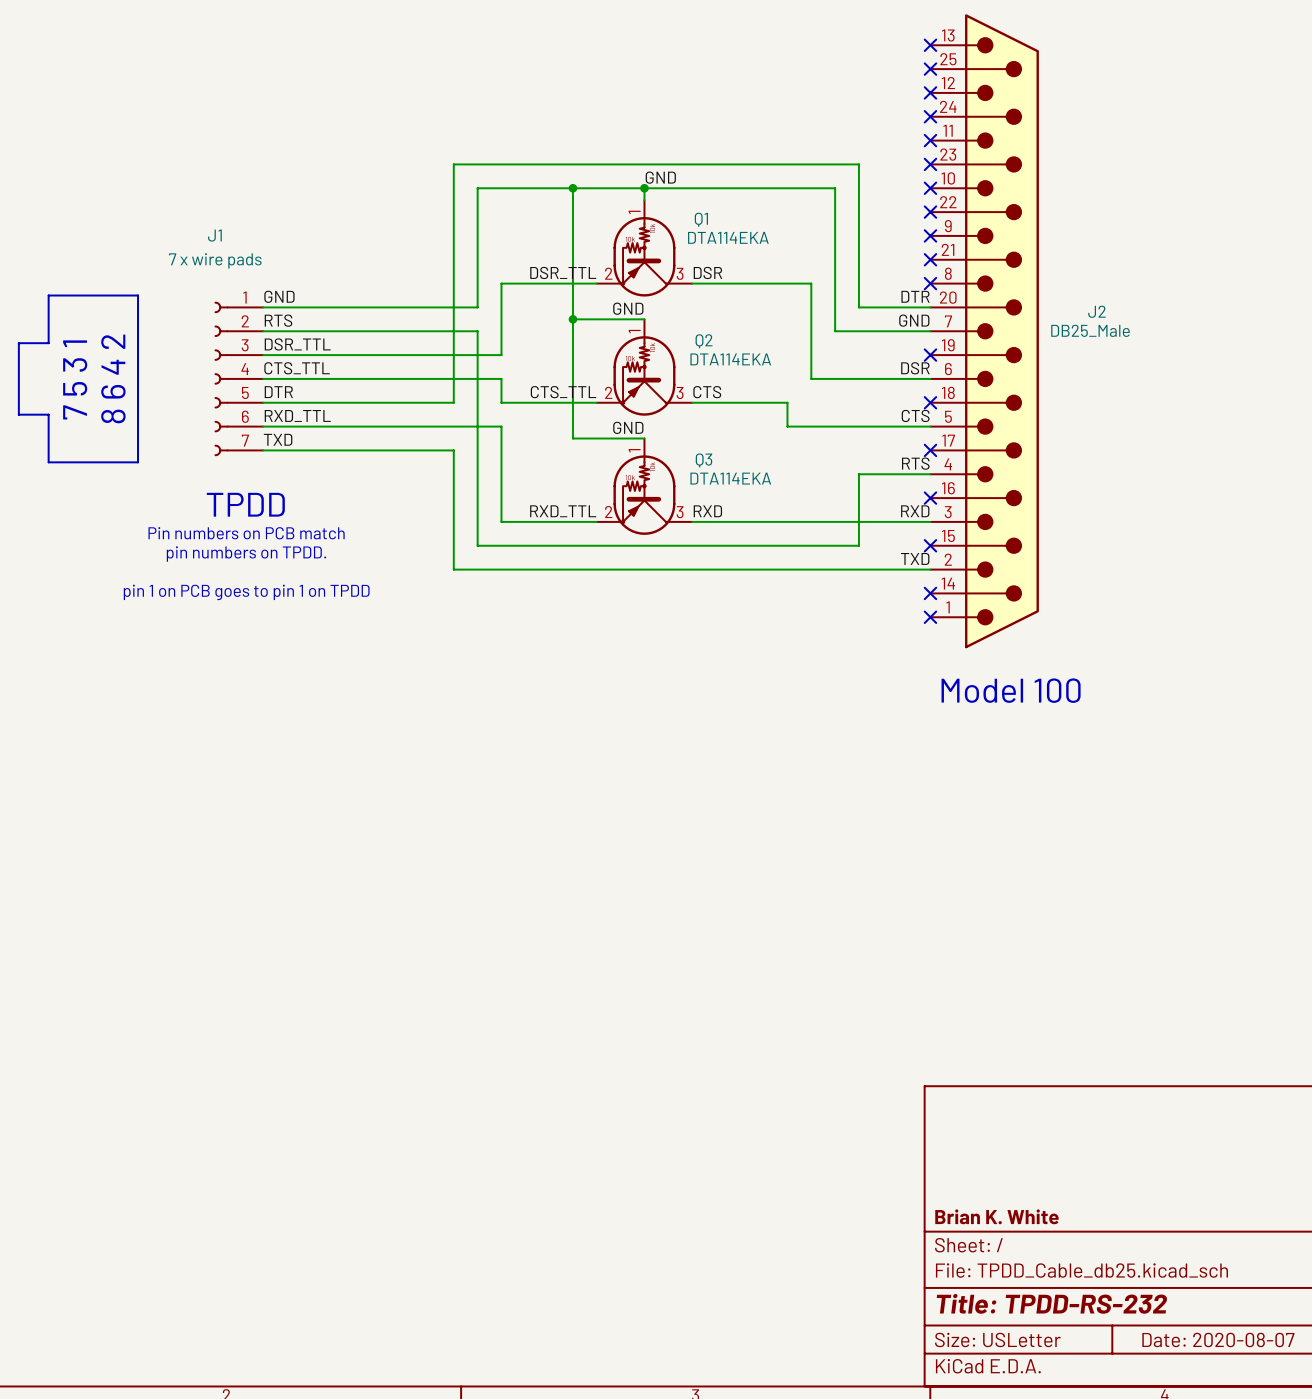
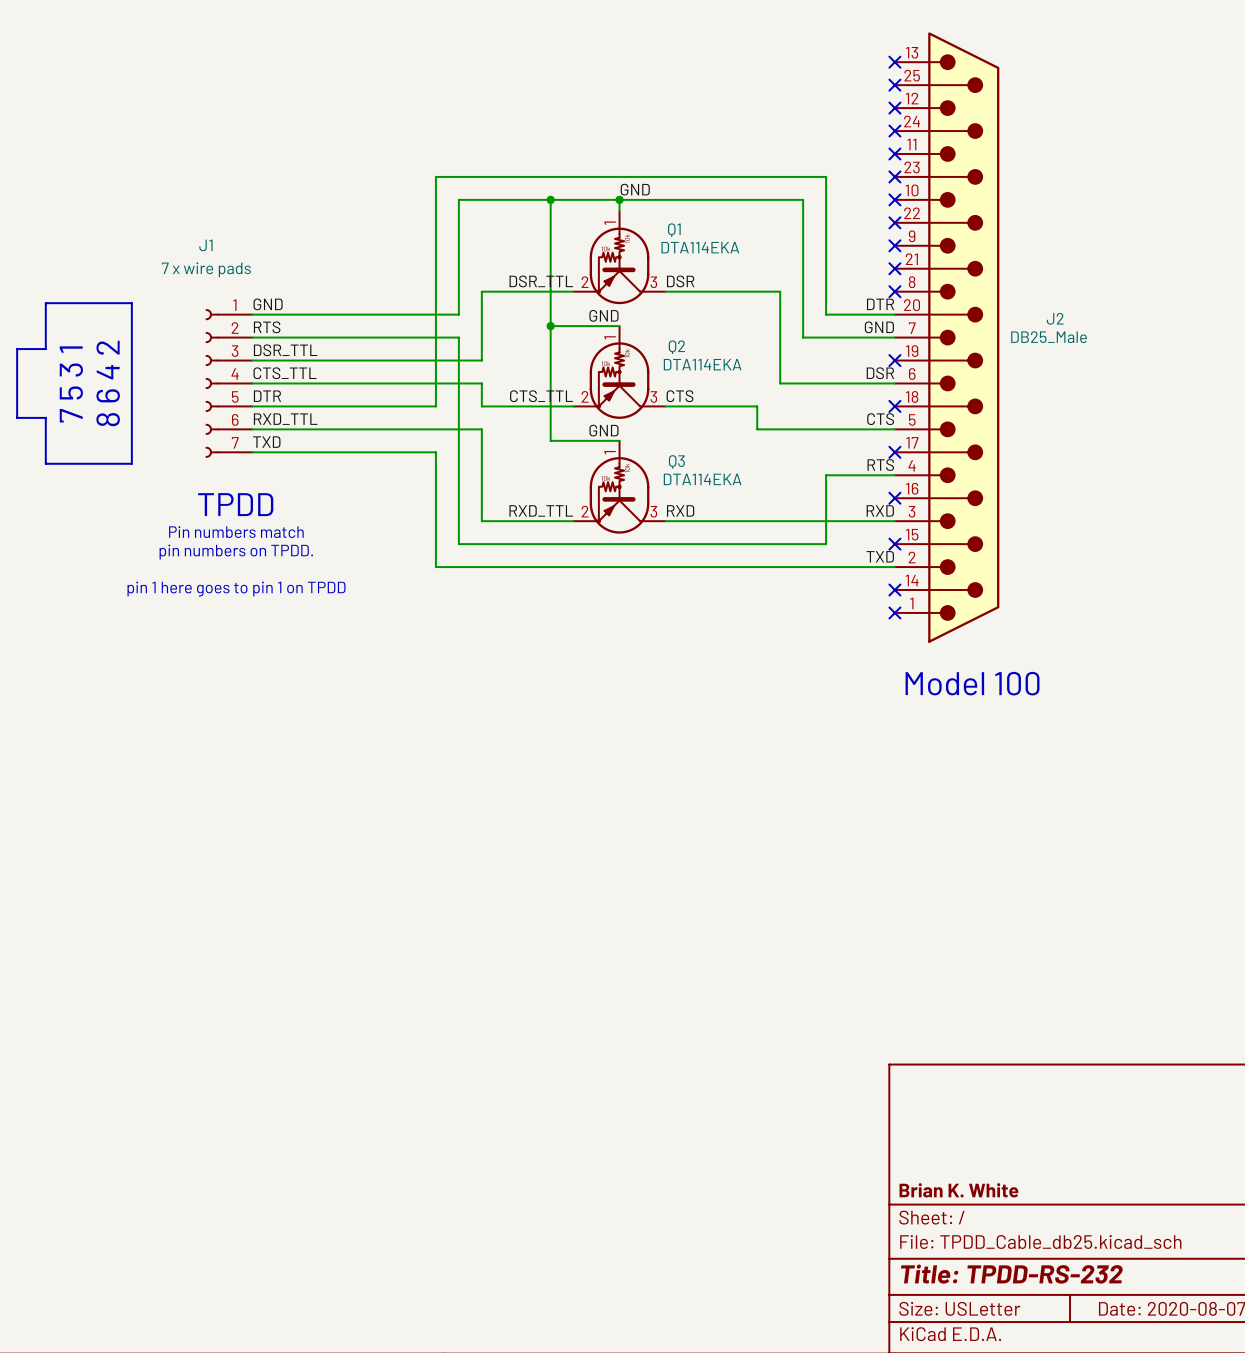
text: Pin numbers on PCB match (246, 533) -> Pin numbers match (236, 532)
text: pin 1 on PCB goes to pin 1 on TPDD (246, 592) -> pin 1 here goes to pin 1 on TPDD (236, 589)

